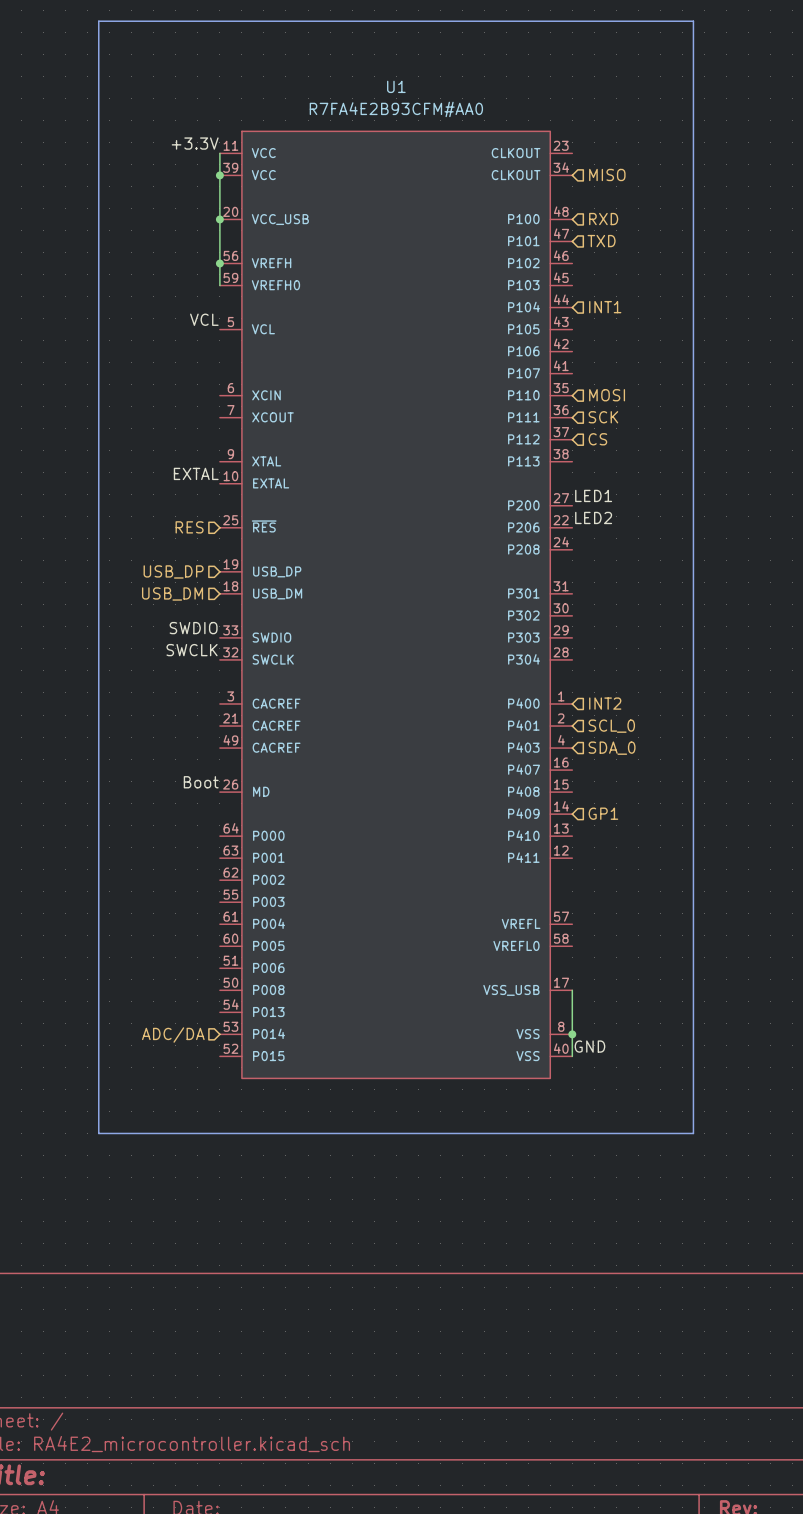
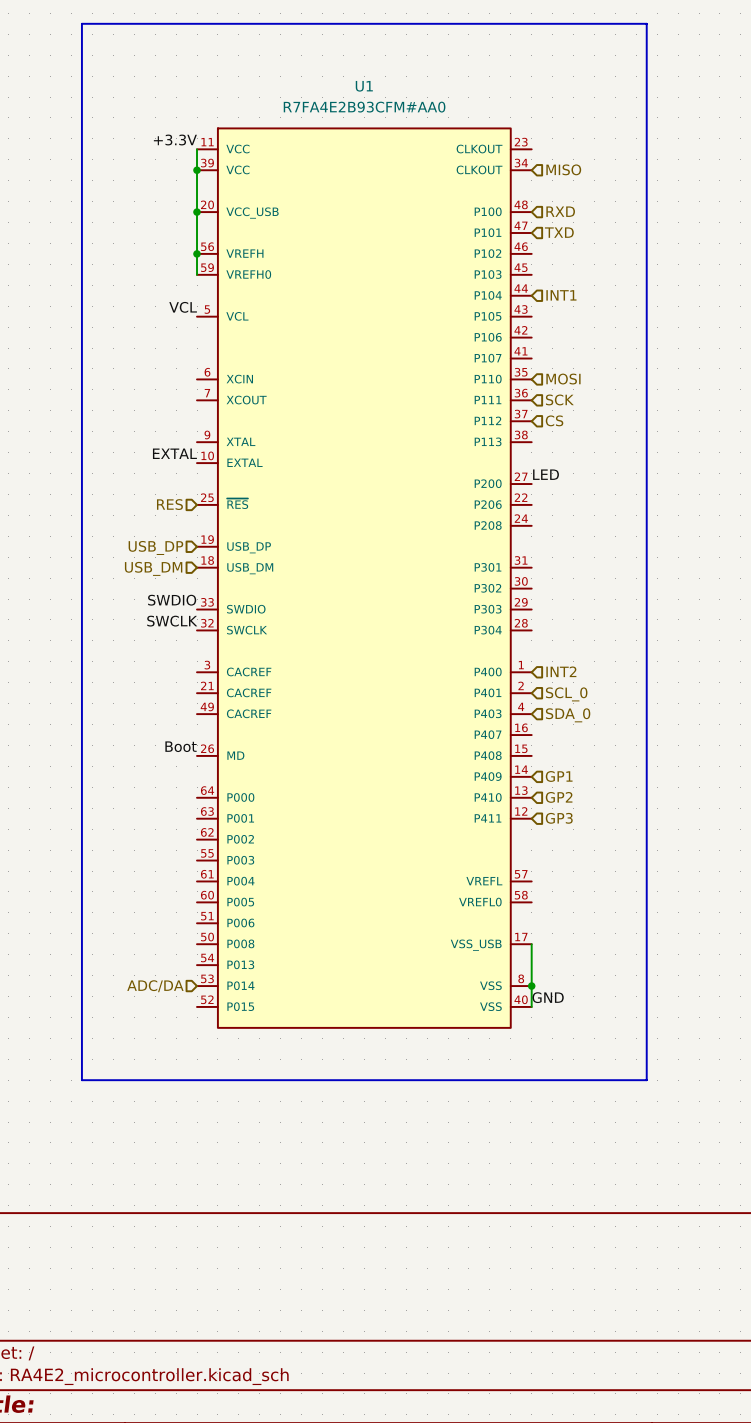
label: LED1 (593, 495) -> LED (546, 474)
label: LED2 (593, 517) -> none
hierarchical label: none -> GP2 (559, 797)
hierarchical label: none -> GP3 (559, 818)

